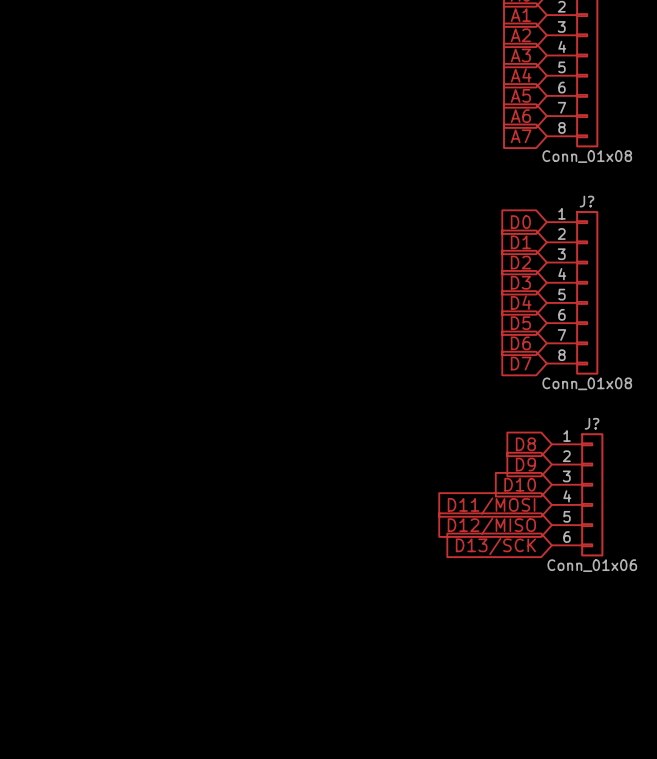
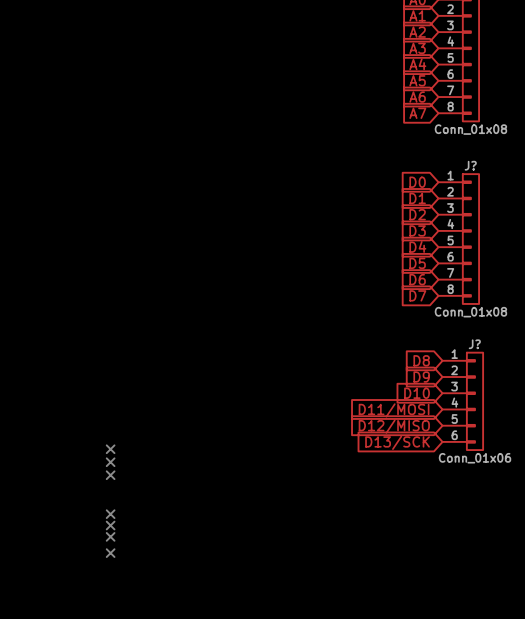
no-connect mark: none -> (110, 449)
no-connect mark: none -> (110, 462)
no-connect mark: none -> (110, 475)
no-connect mark: none -> (110, 514)
no-connect mark: none -> (110, 525)
no-connect mark: none -> (110, 536)
no-connect mark: none -> (110, 553)

